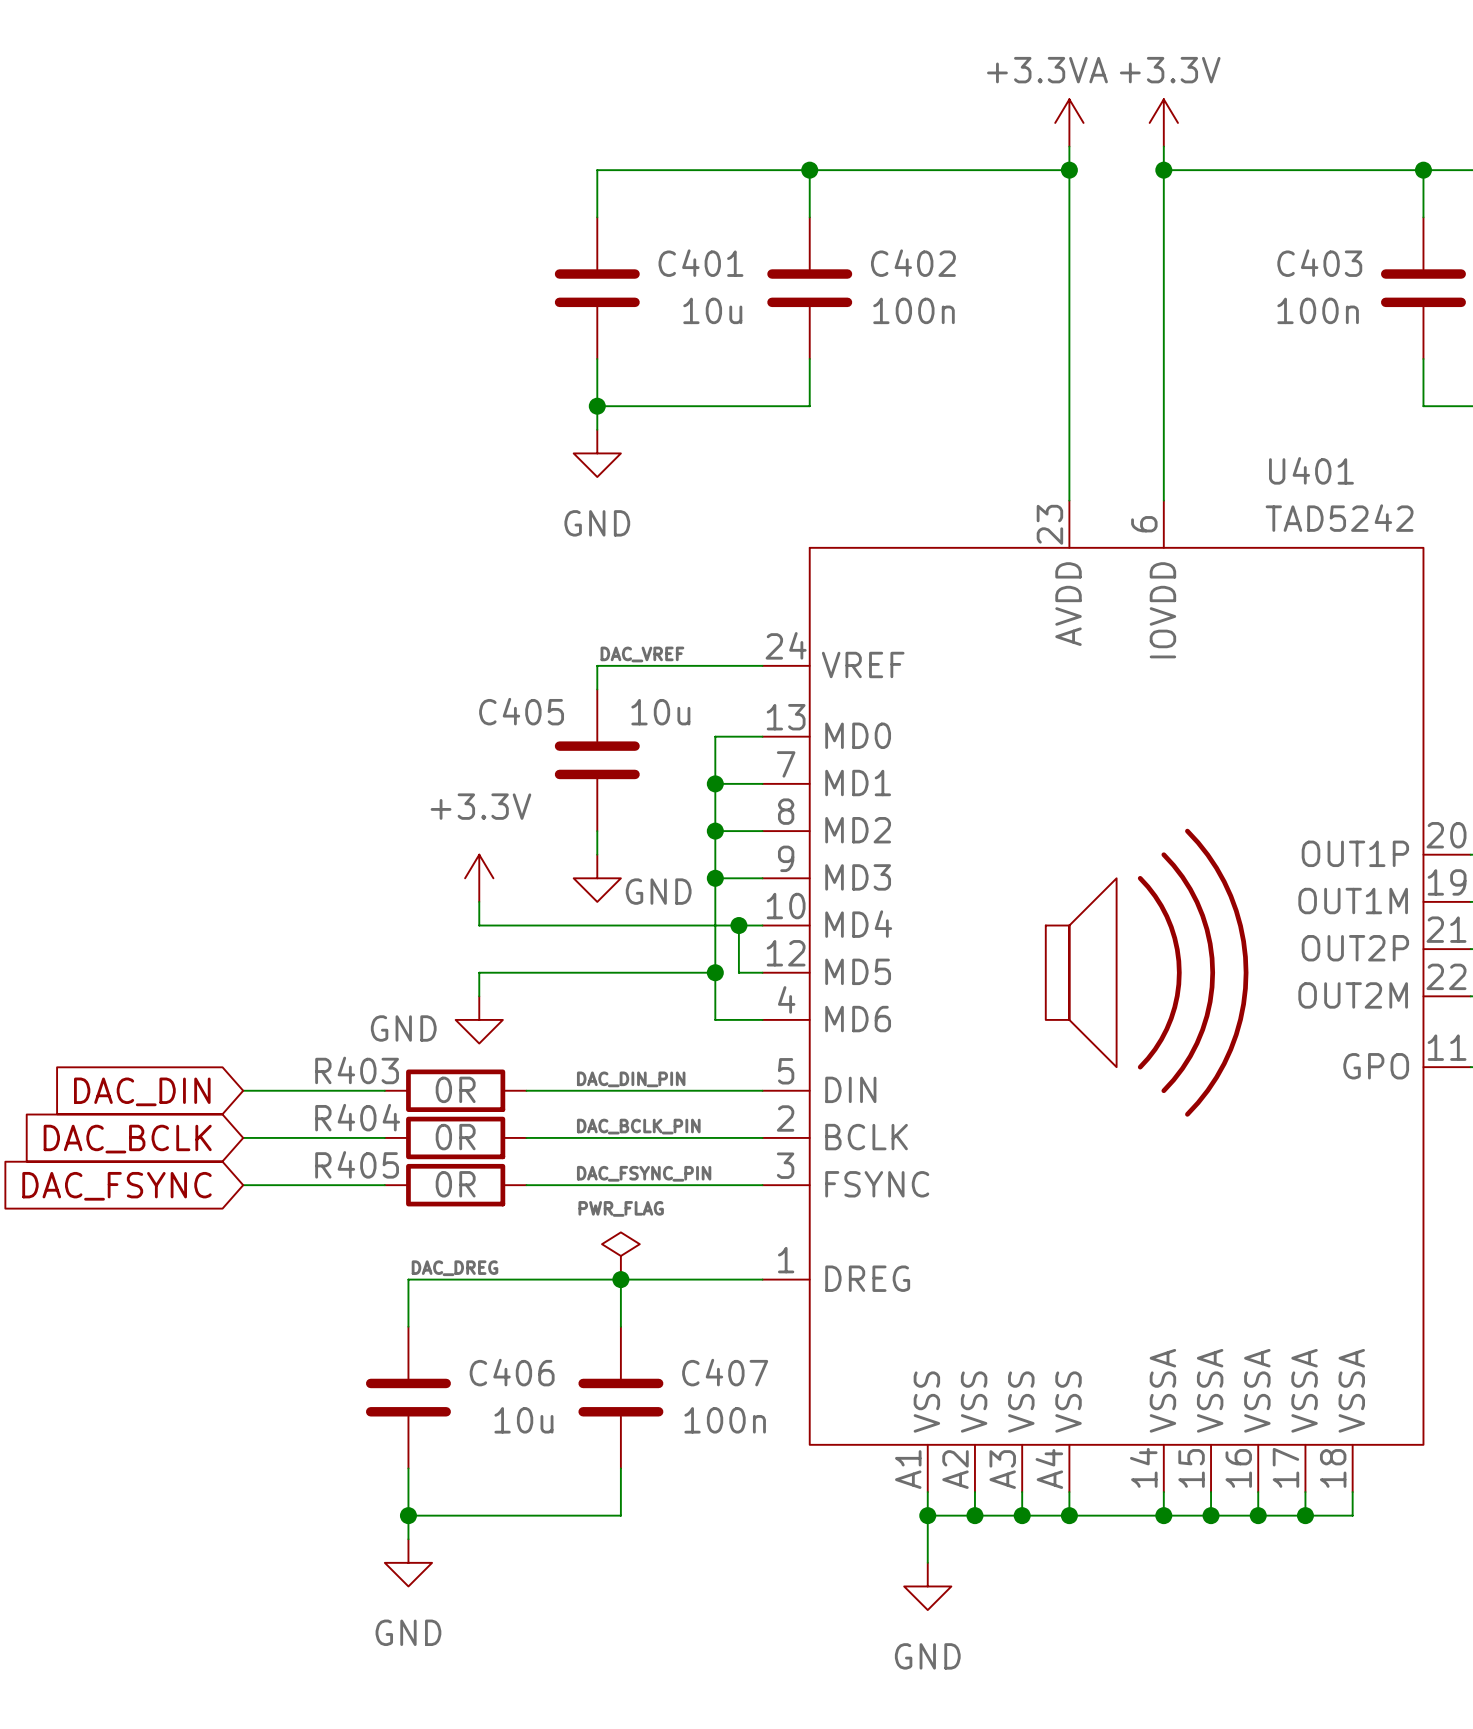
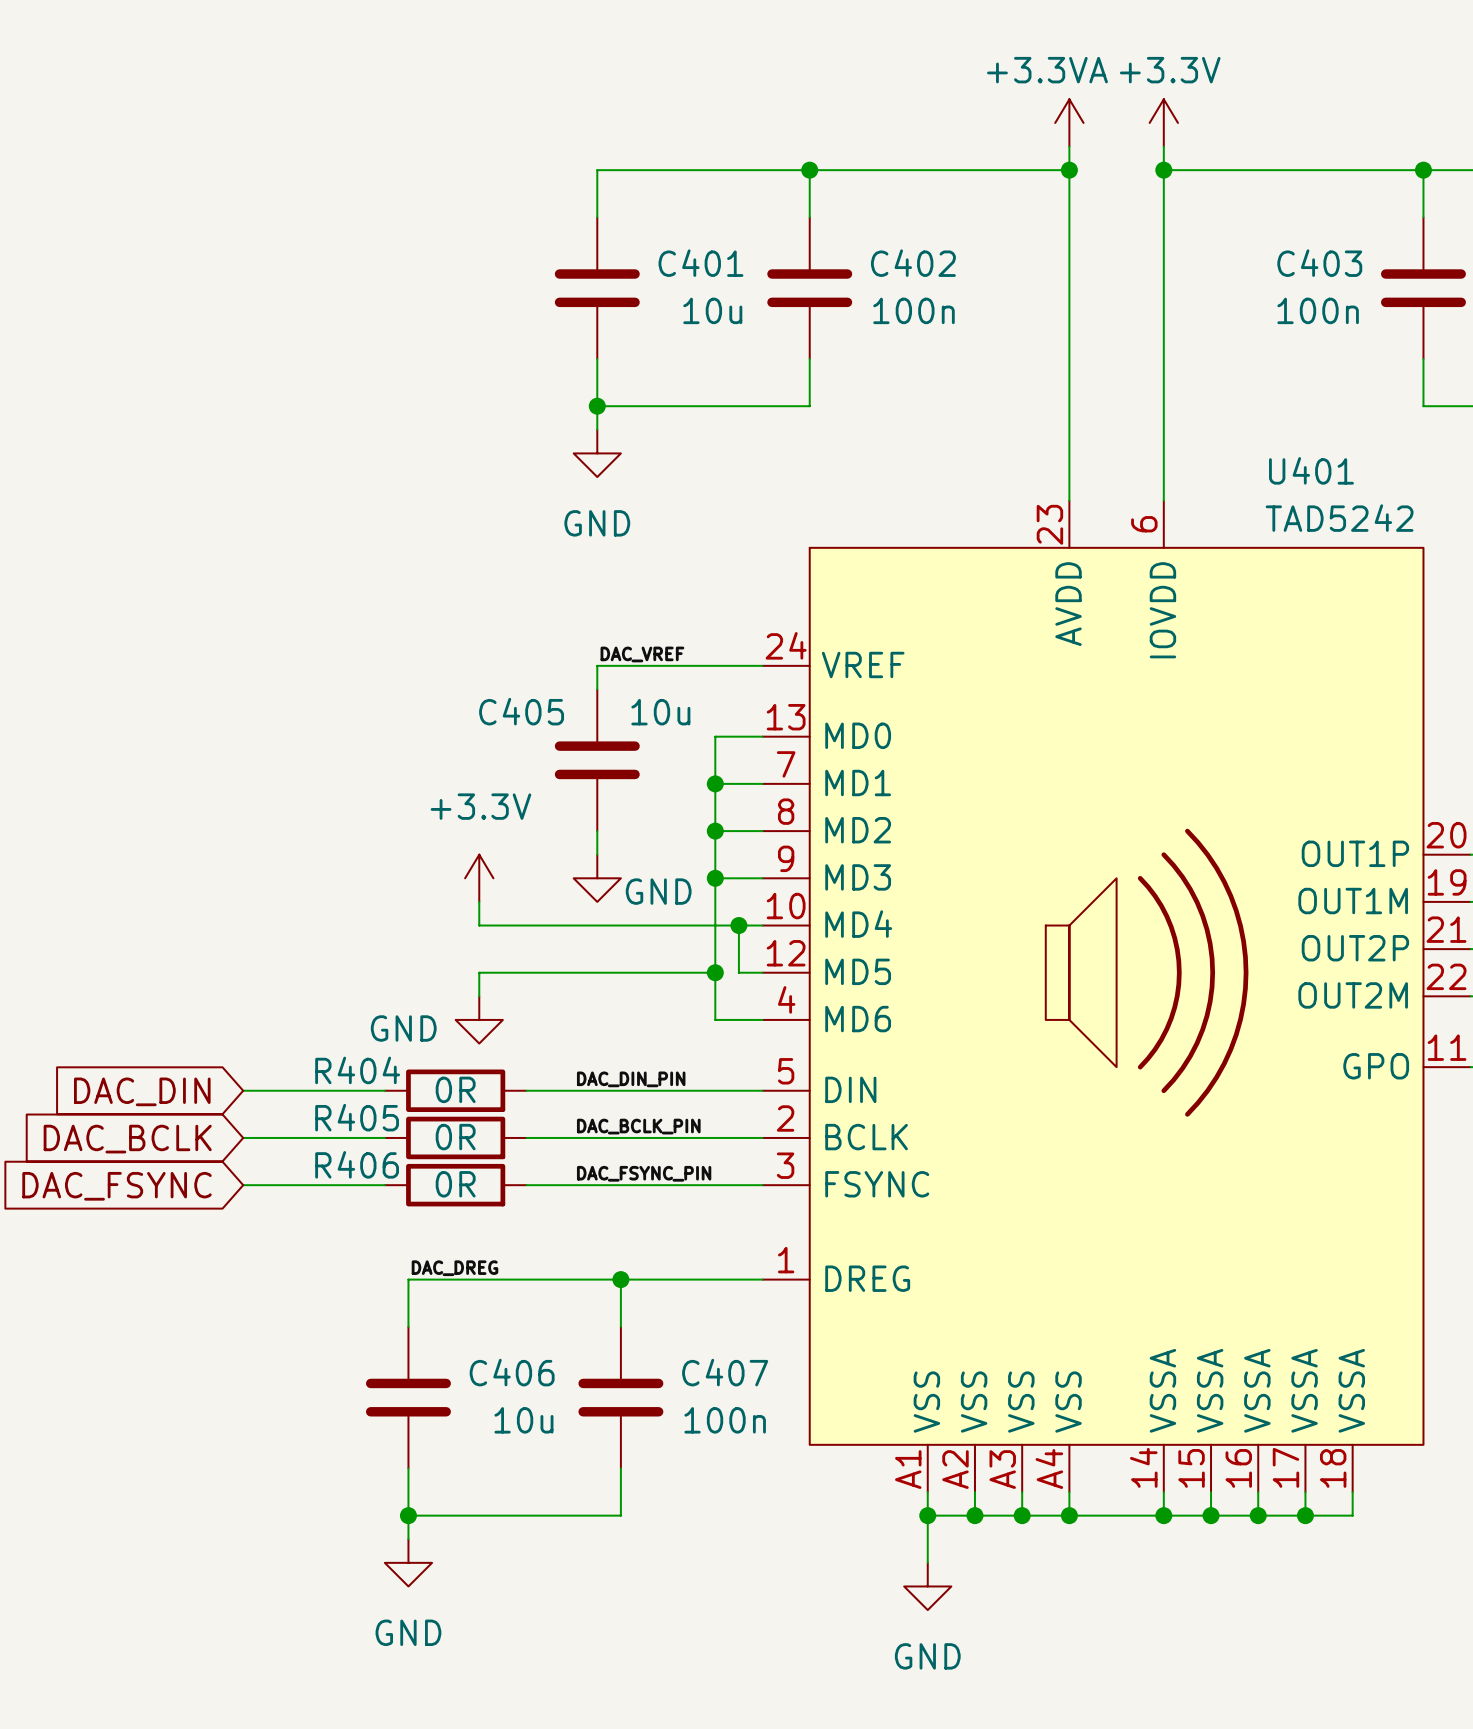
R403 name: R403 (357, 1070) -> R404 (357, 1070)
R404 name: R404 (357, 1117) -> R405 (357, 1117)
R405 name: R405 (357, 1164) -> R406 (357, 1164)
power symbol: PWR_FLAG (620, 1255) -> none

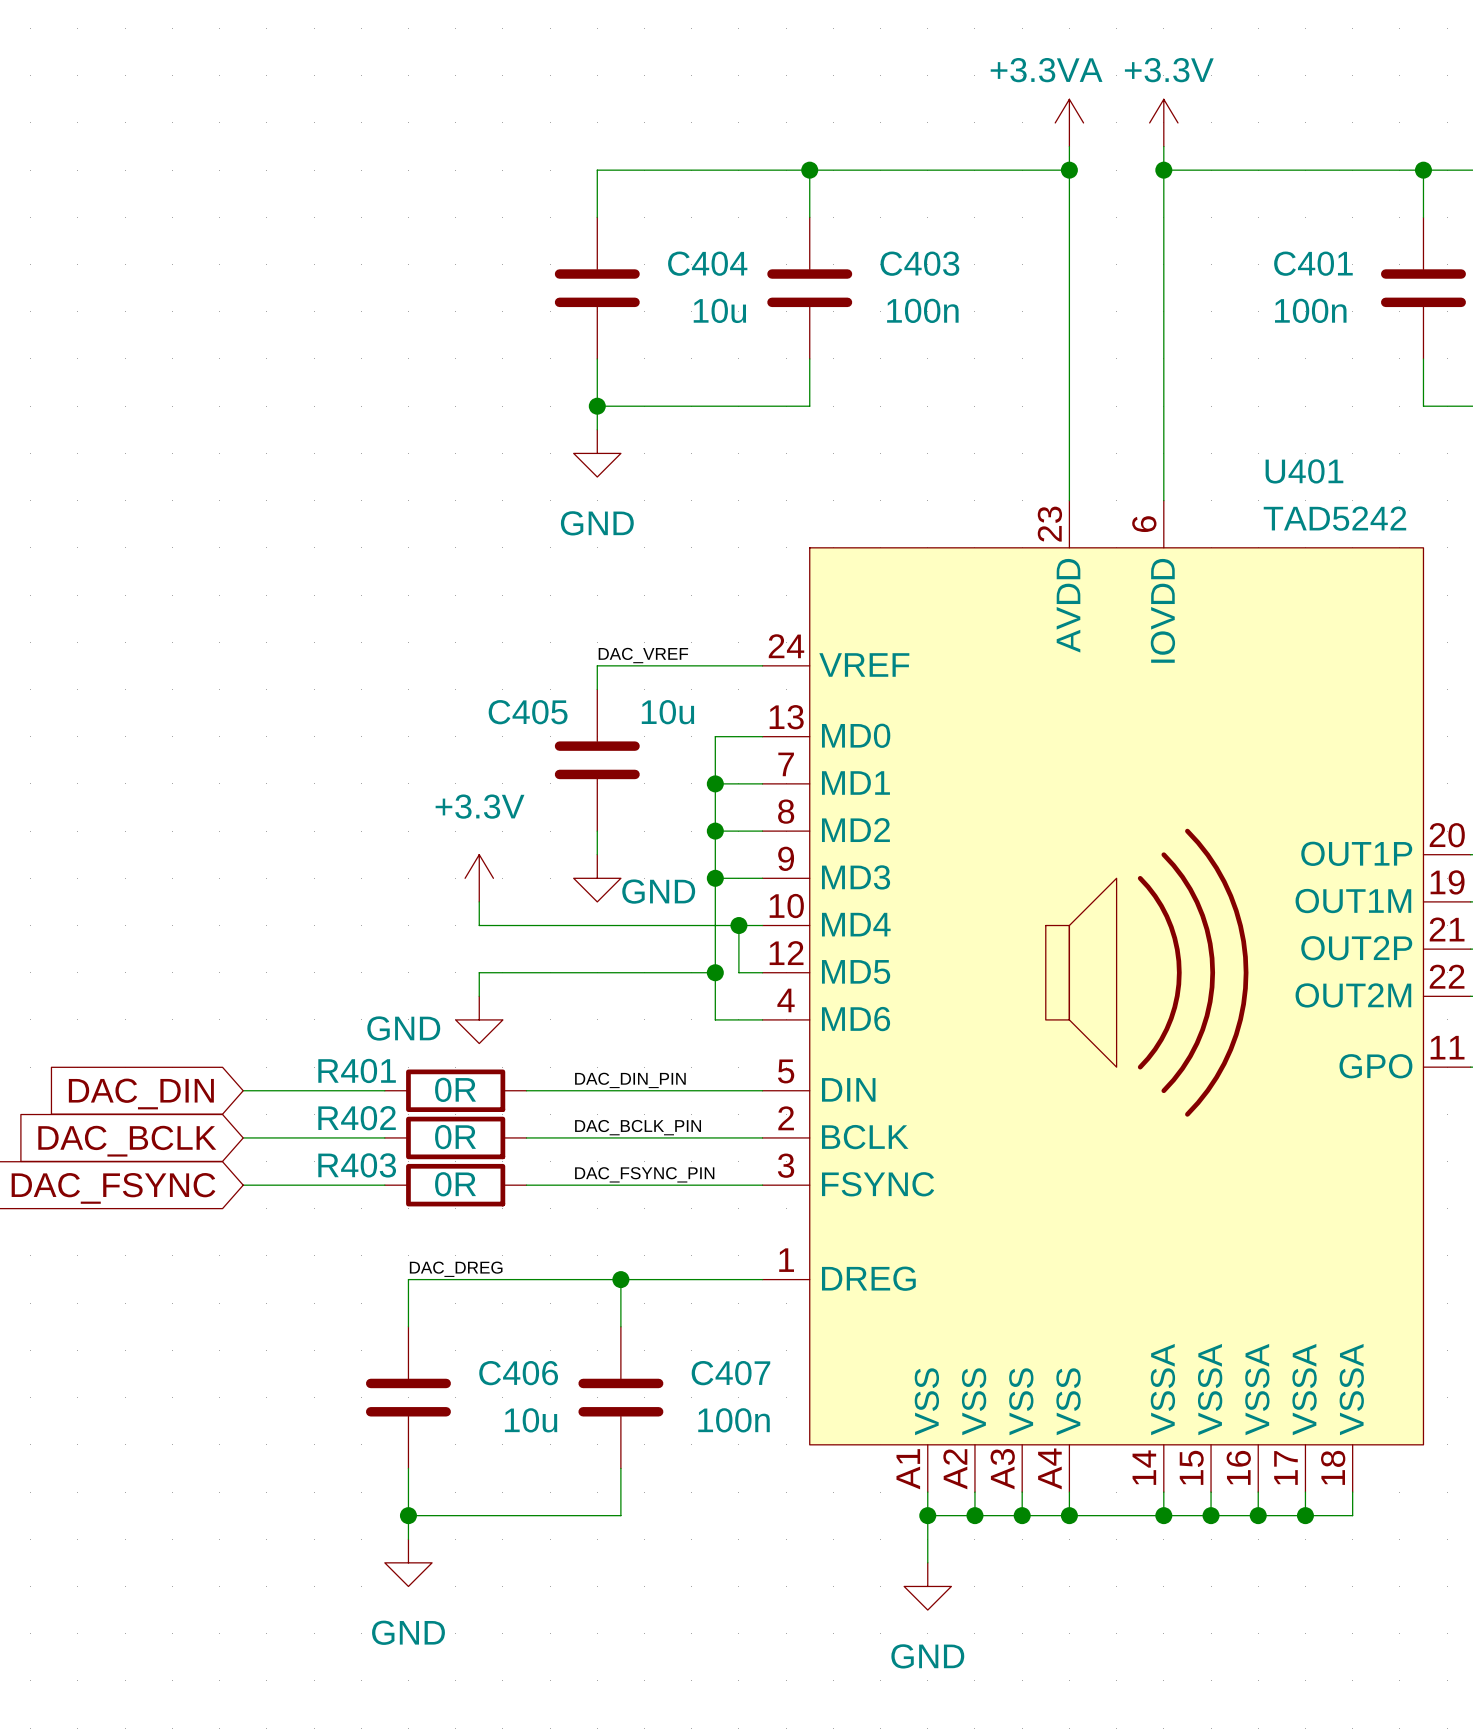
C401 name: C401 (700, 263) -> C404 (707, 263)
C402 name: C402 (913, 263) -> C403 (919, 263)
C403 name: C403 (1319, 263) -> C401 (1313, 263)
R404 name: R404 (357, 1070) -> R401 (357, 1070)
R405 name: R405 (357, 1117) -> R402 (357, 1118)
R406 name: R406 (357, 1164) -> R403 (357, 1165)

